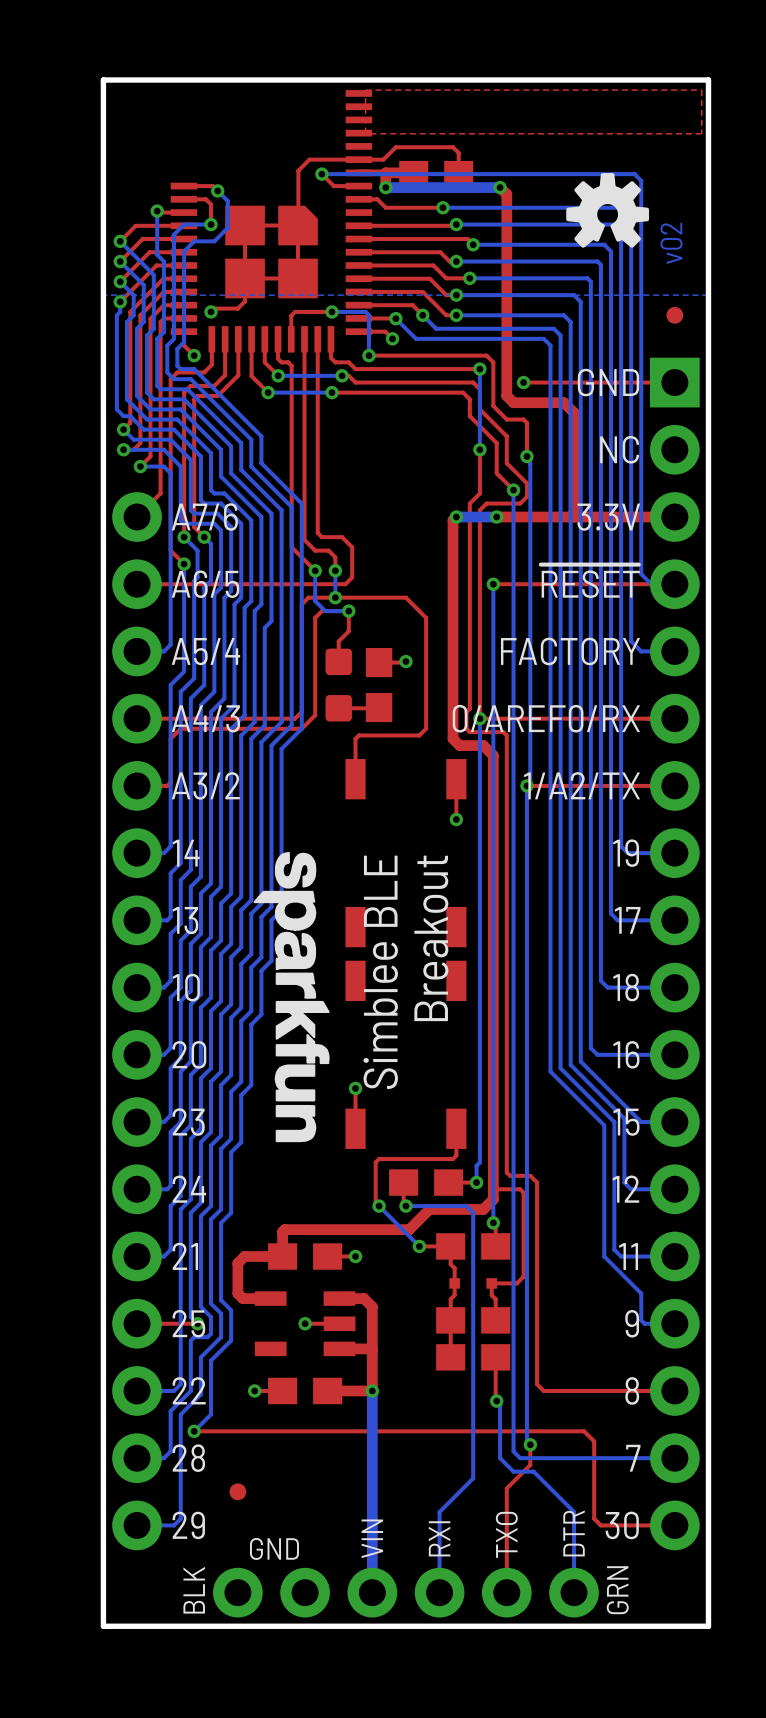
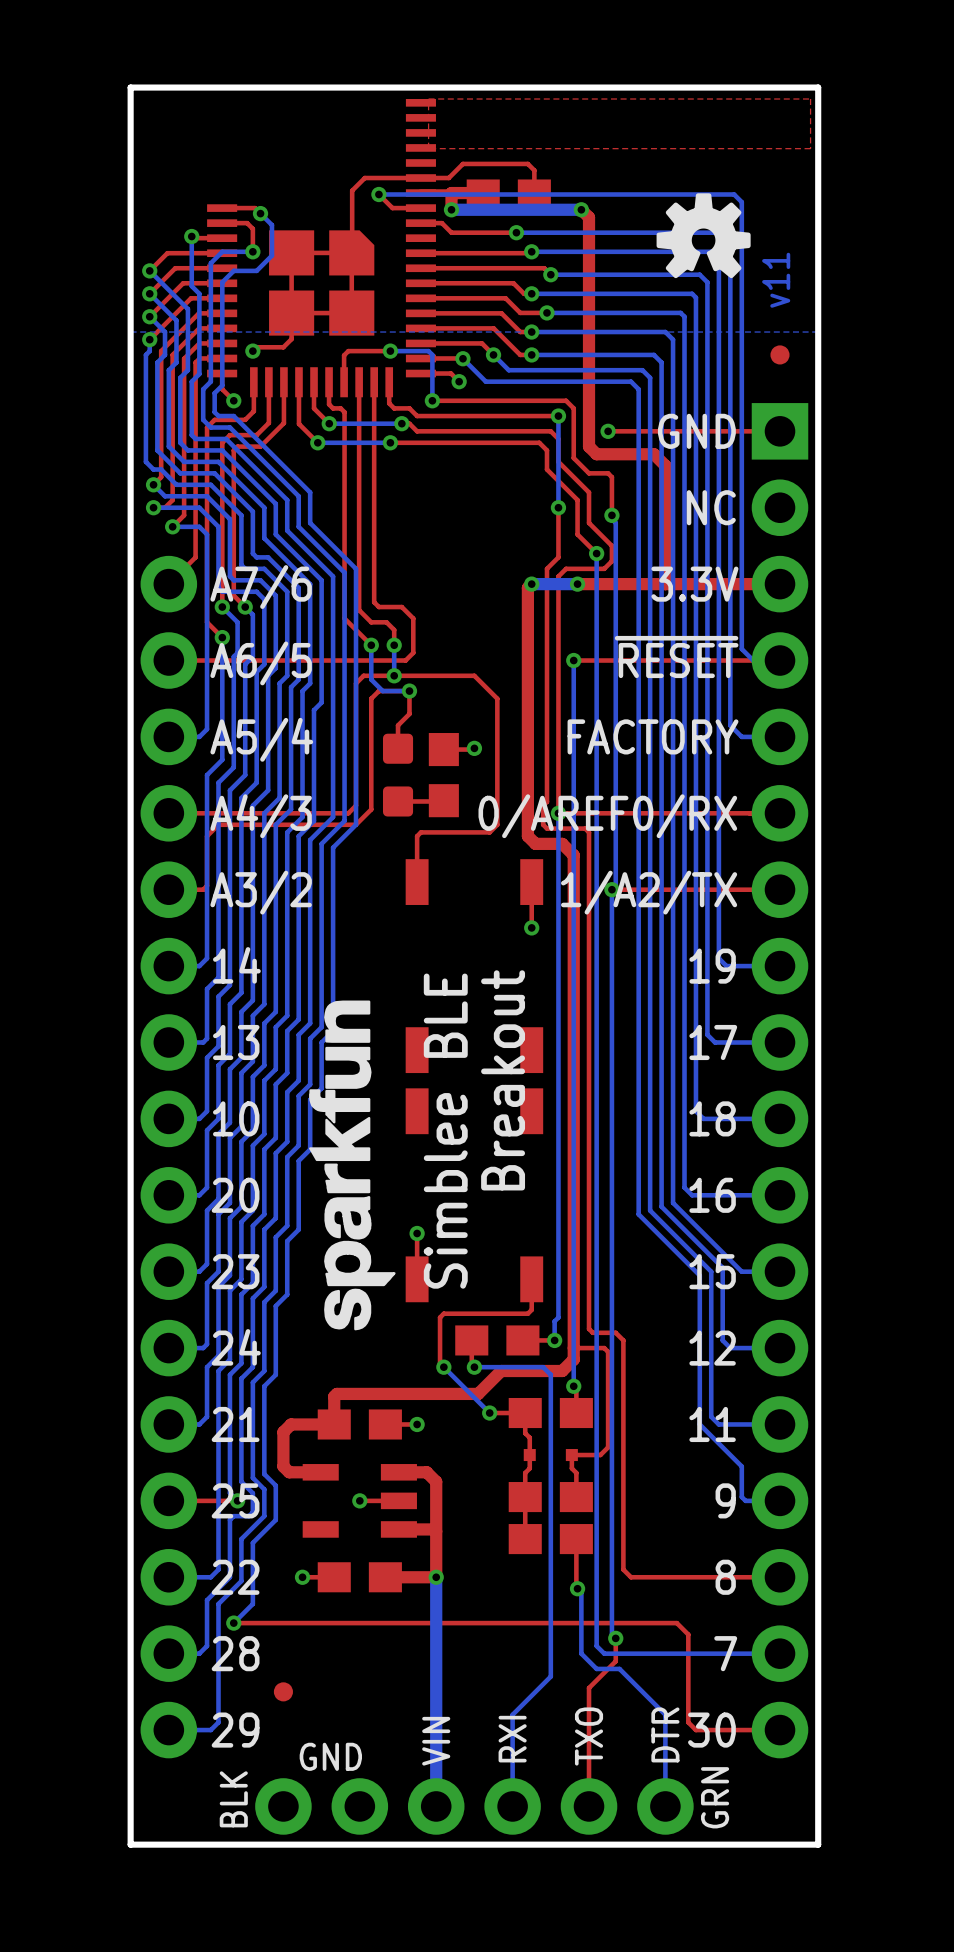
text: v02 (671, 243) -> v11 (776, 280)
drawing: [253, 851, 330, 1143] -> none
drawing: none -> [309, 1000, 396, 1331]

